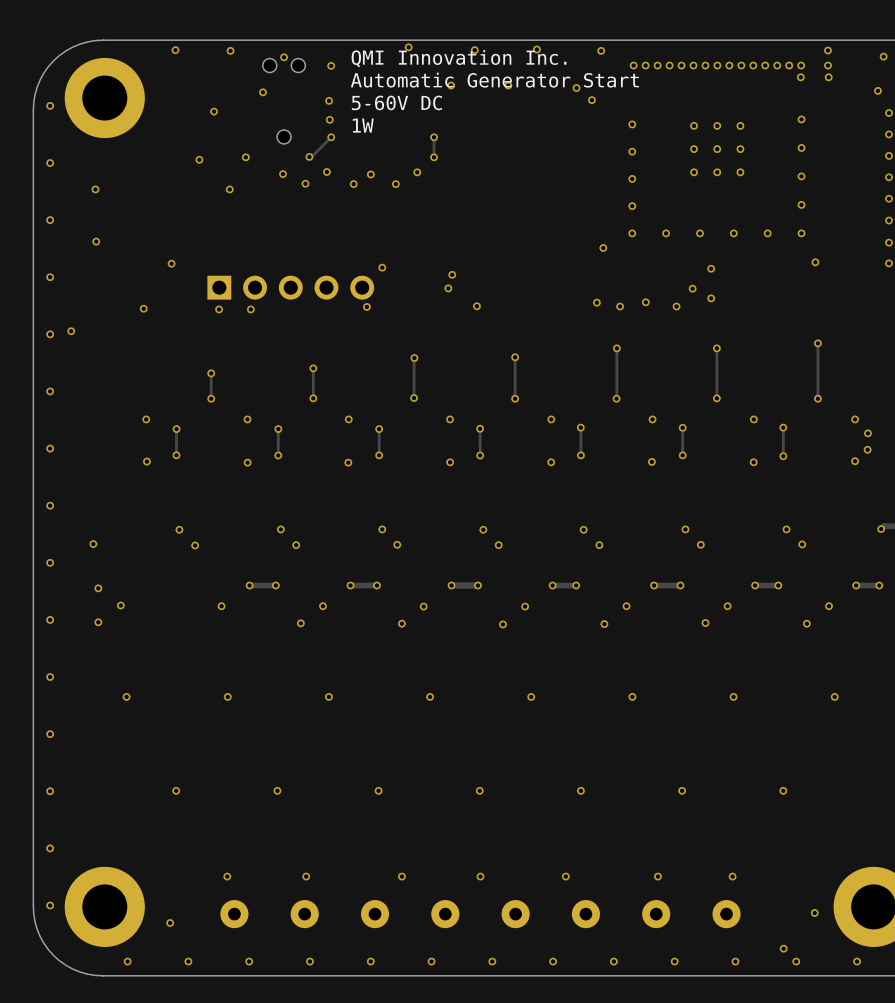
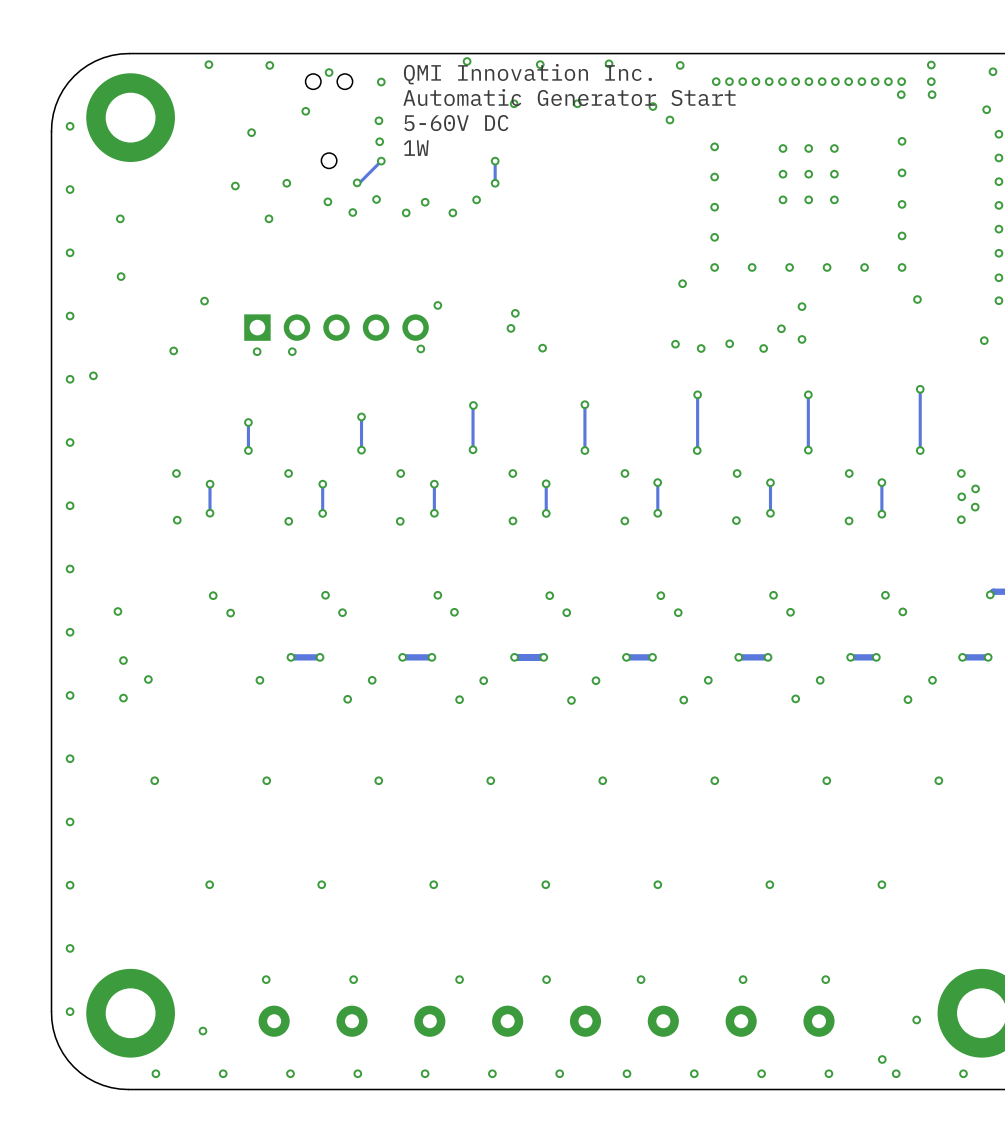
via: none -> (984, 340)
via: none -> (961, 496)

